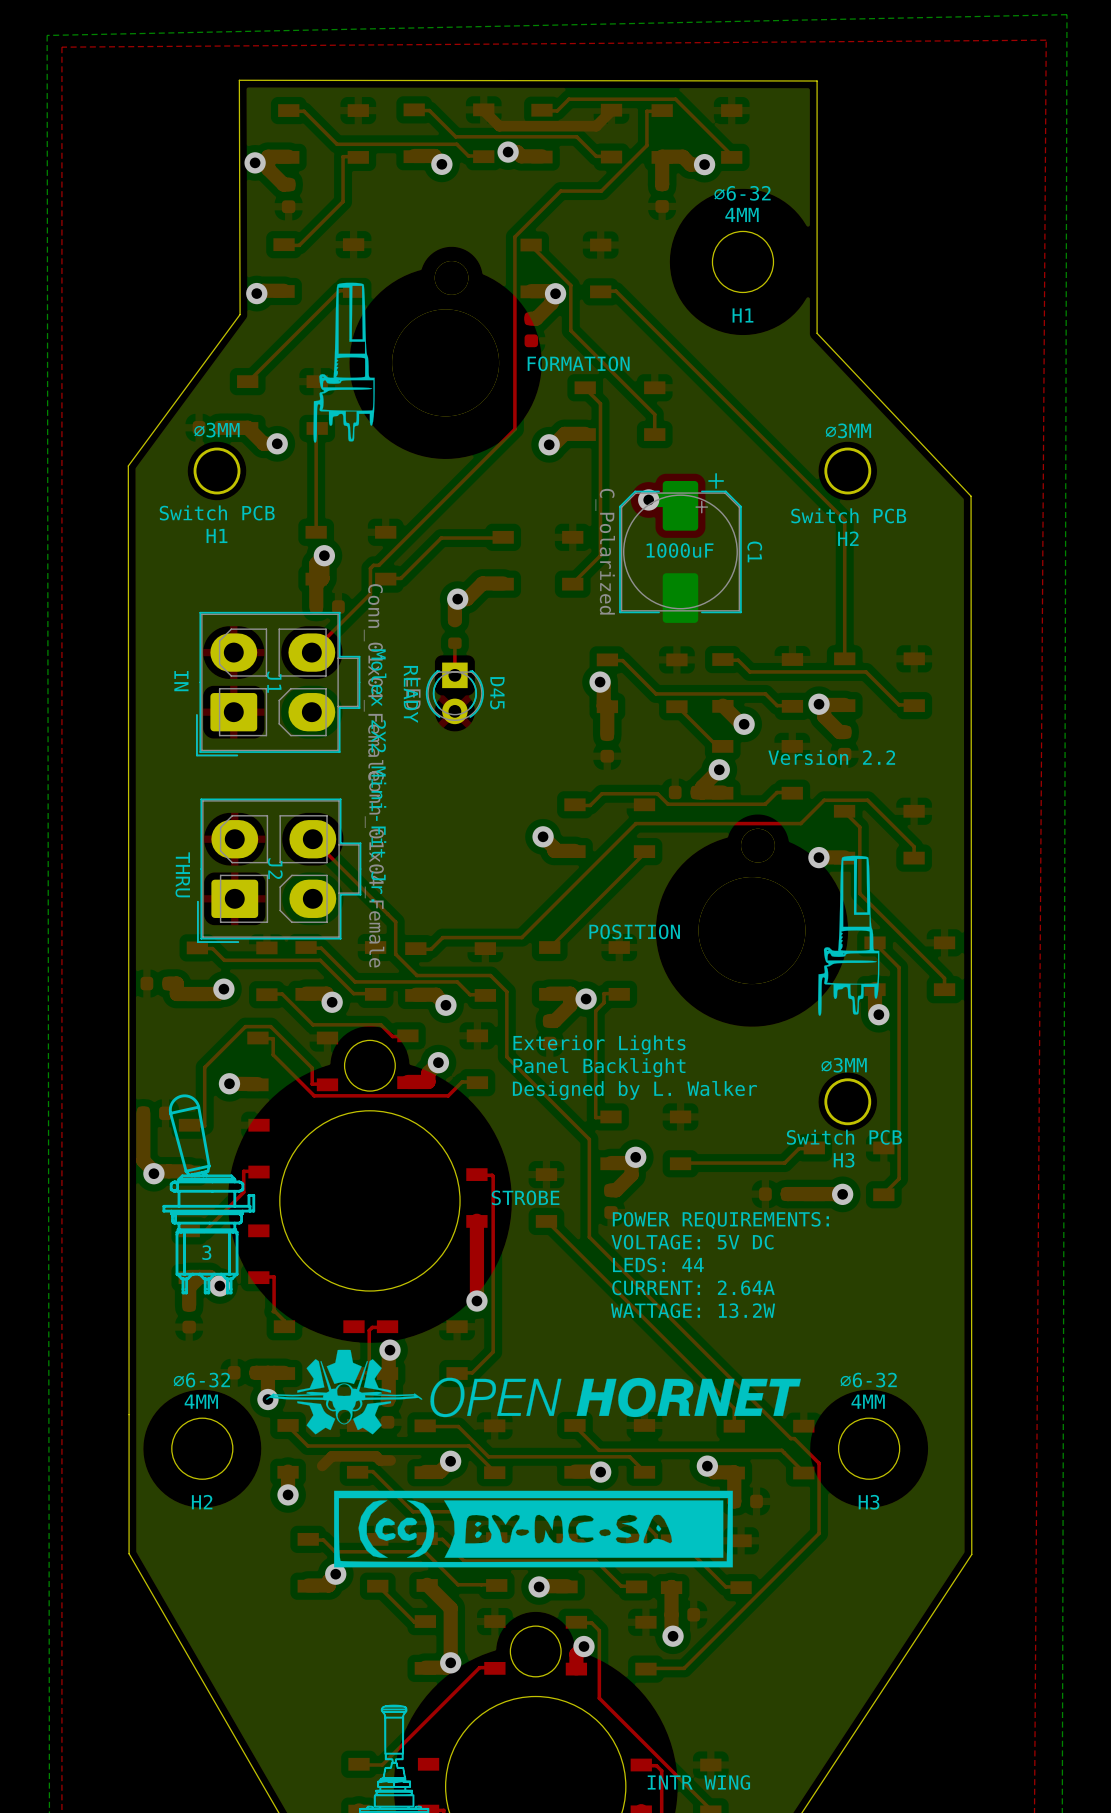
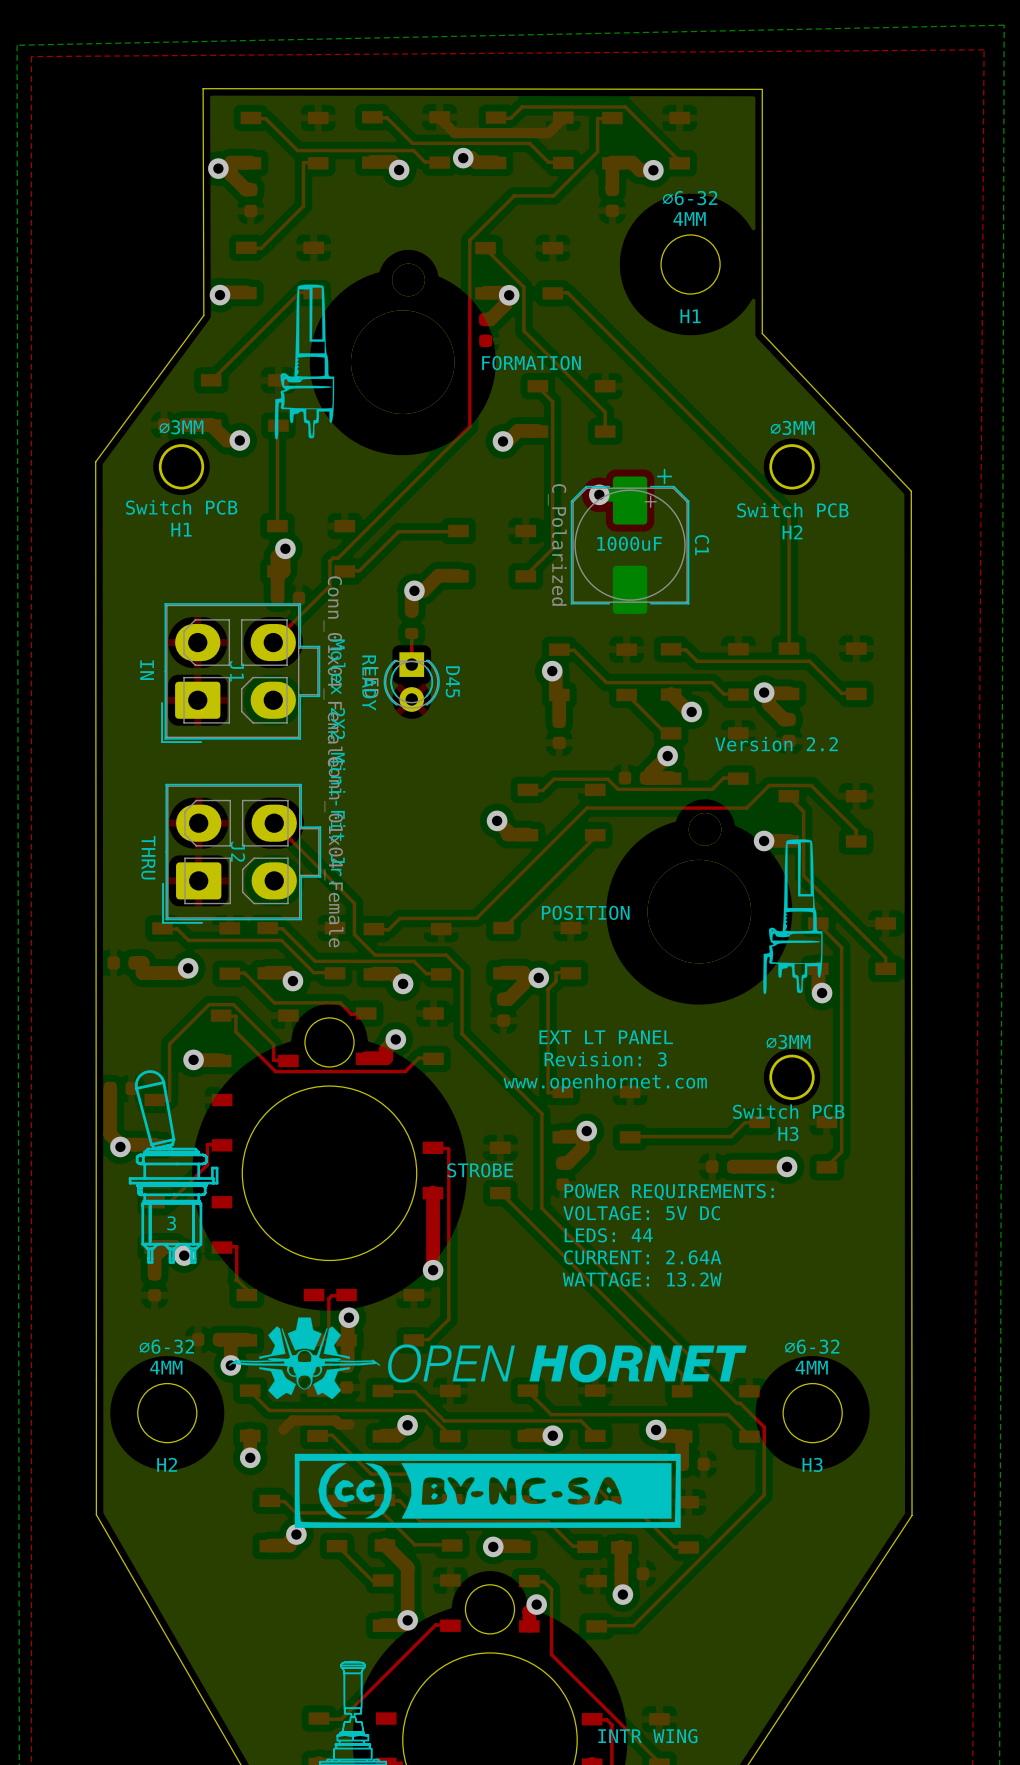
text: Exterior Lights (599, 1044) -> none
text: none -> EXT LT PANEL (606, 1037)
text: Panel Backlight (599, 1067) -> none
text: none -> Revision: 3 (605, 1059)
text: Designed by L. Walker (634, 1090) -> none
text: none -> www.openhornet.com (605, 1083)

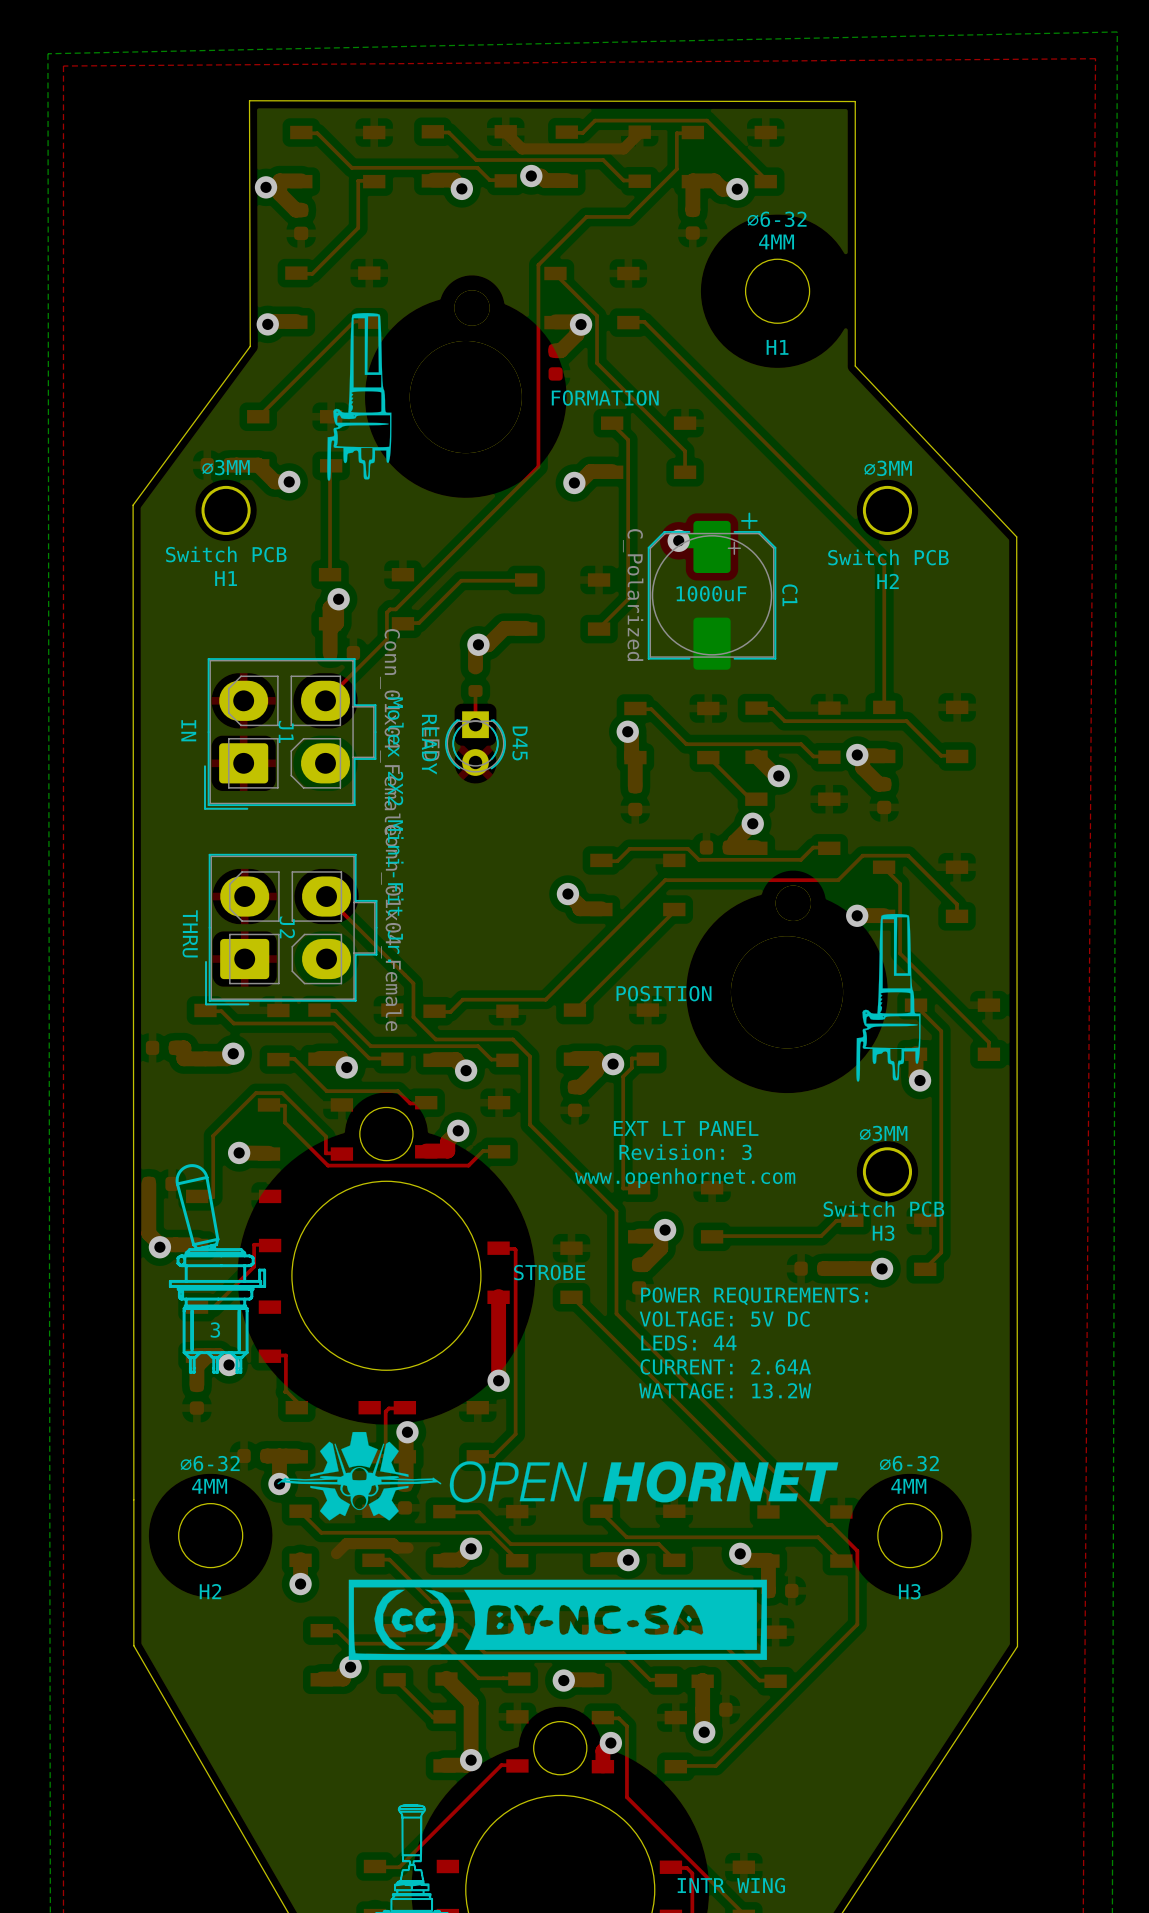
text: Version 2.2 (776, 744) -> none

